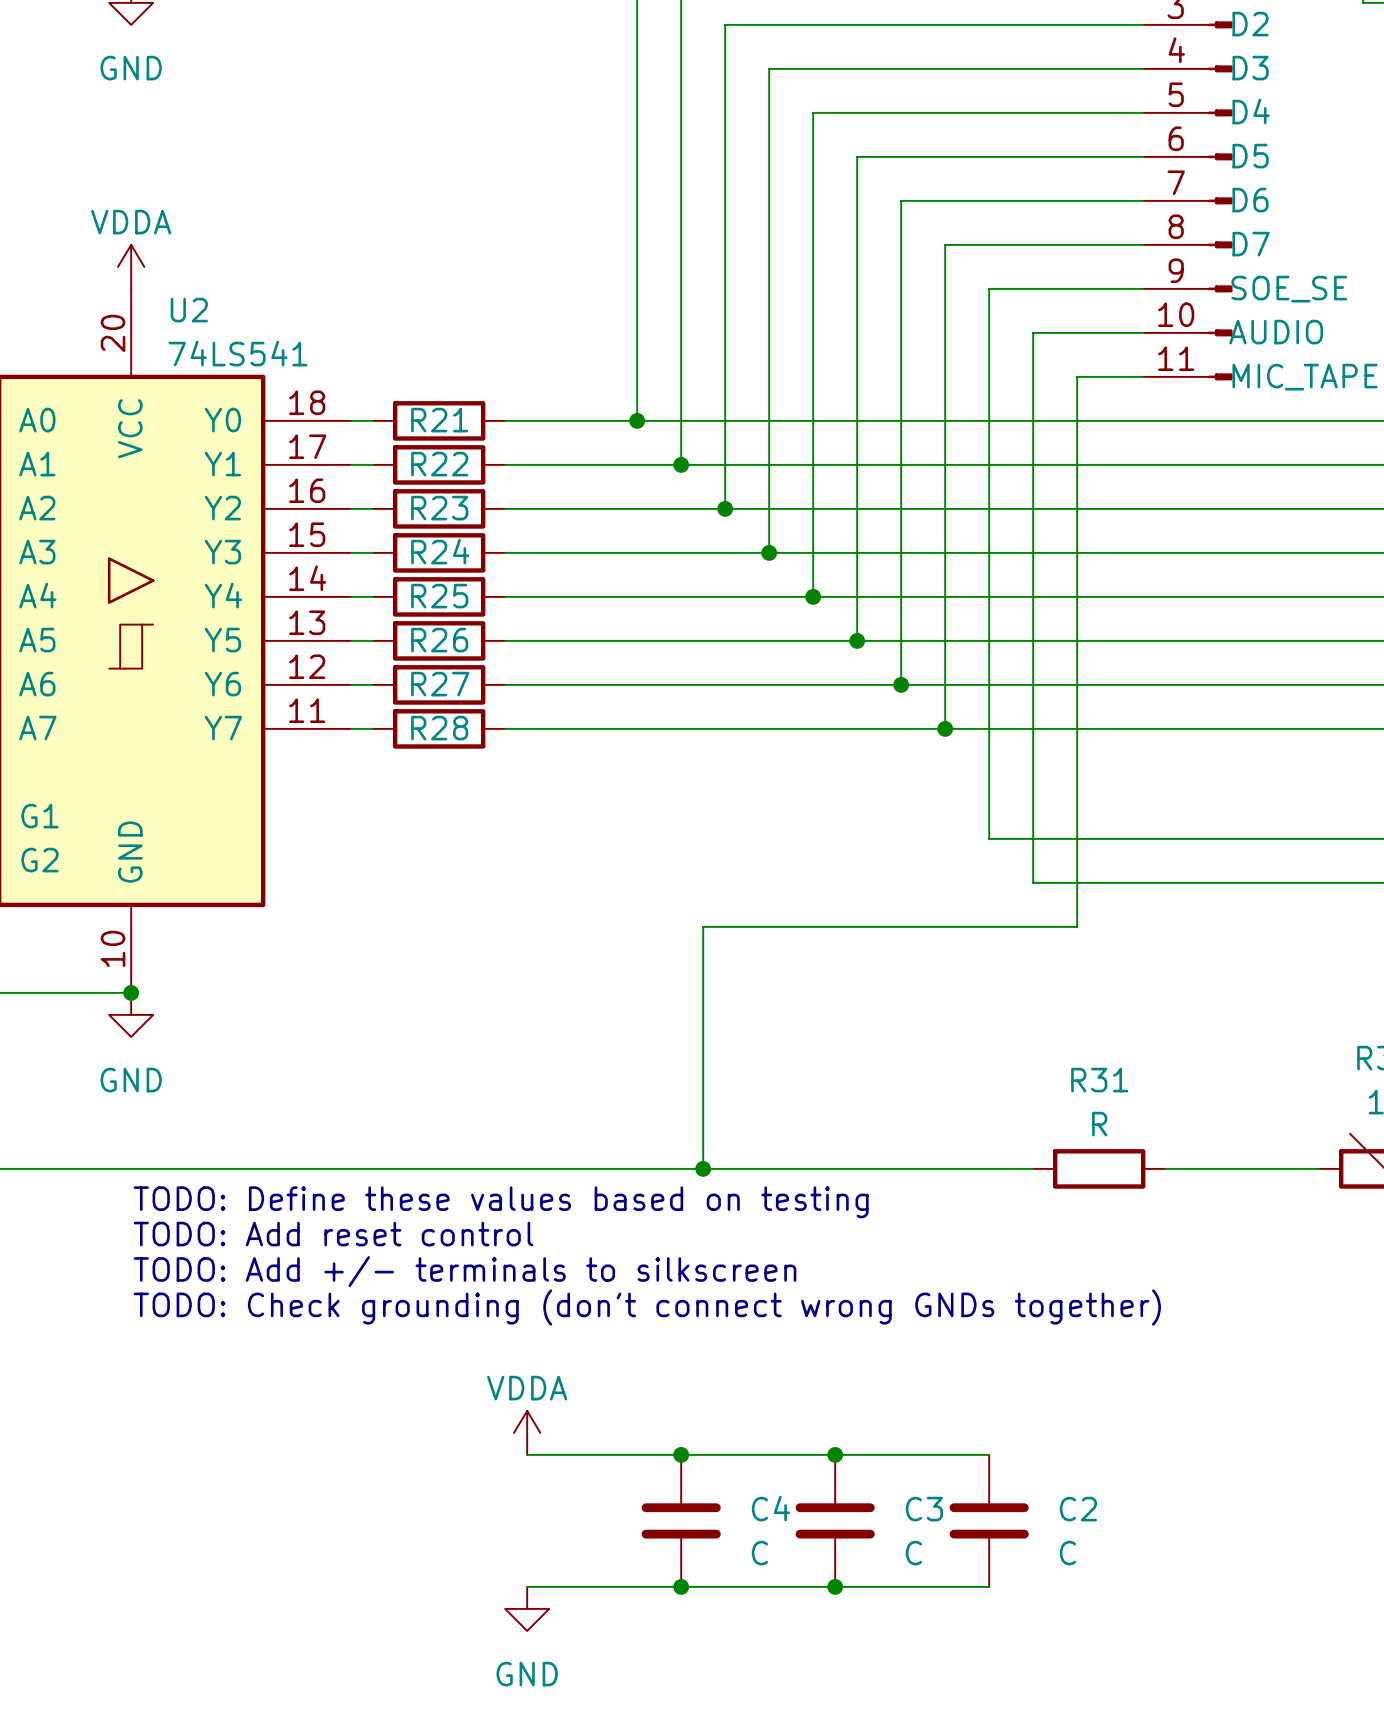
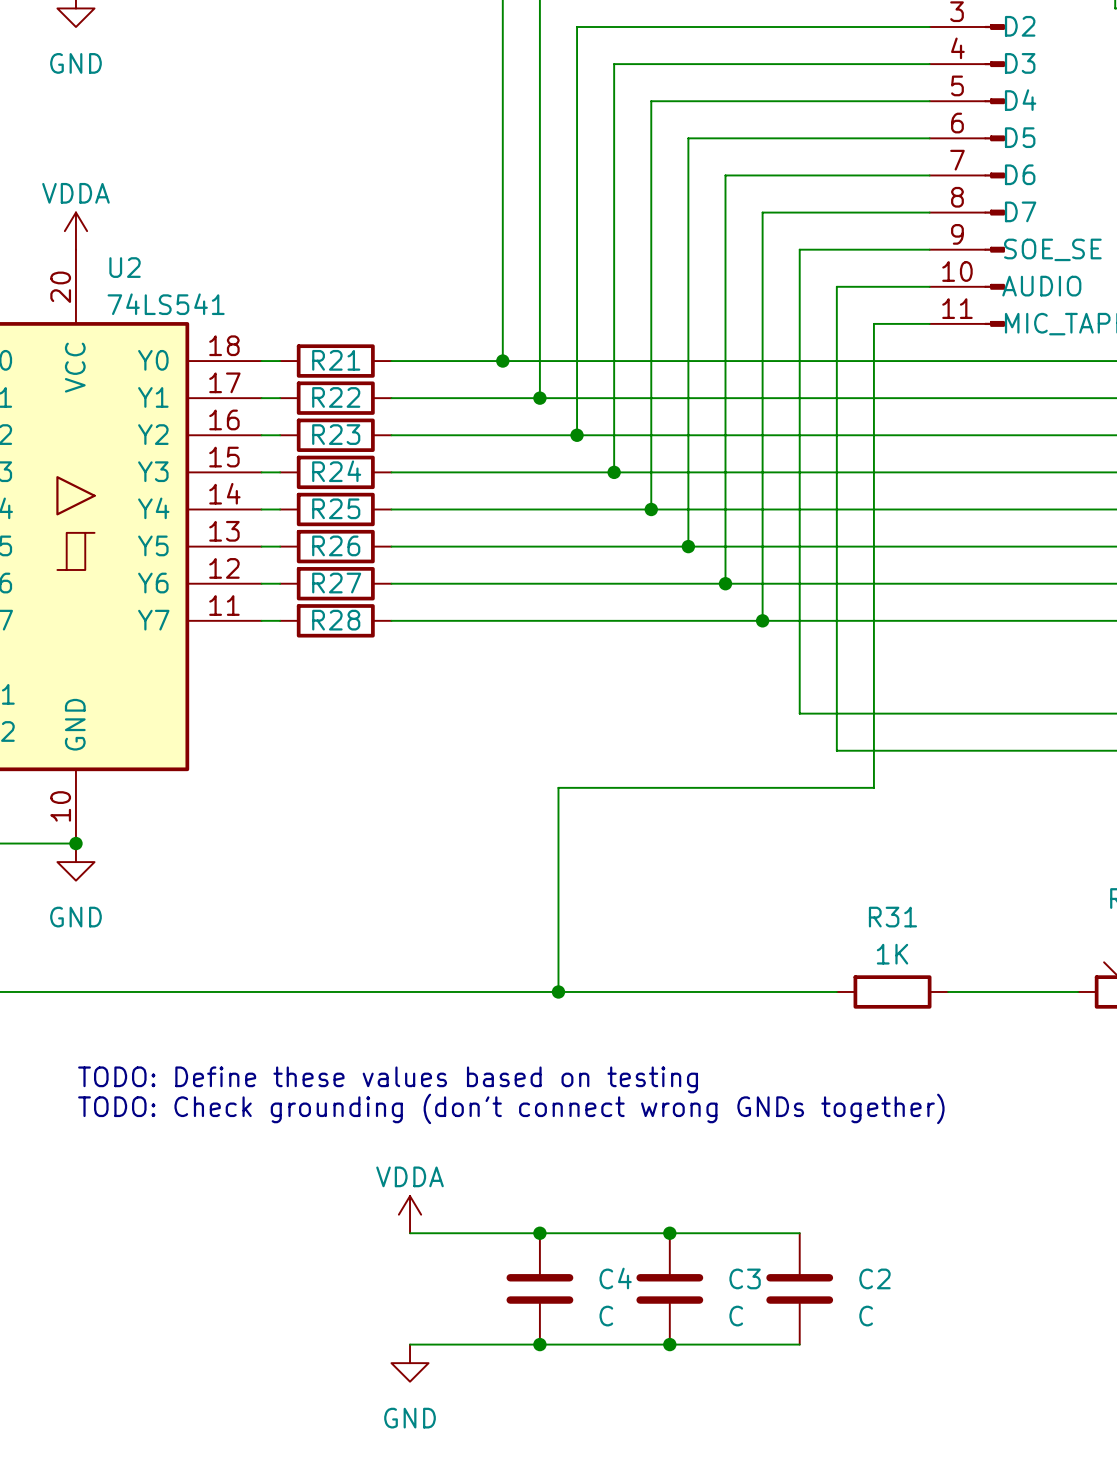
R31 value: R (1099, 1124) -> 1K (892, 954)
text: TODO: Define these values based on testing (501, 1202) -> none
text: TODO: Add reset control (333, 1234) -> none
text: TODO: Add +/- terminals to silkscreen (465, 1271) -> TODO: Define these values based on testing (388, 1079)

